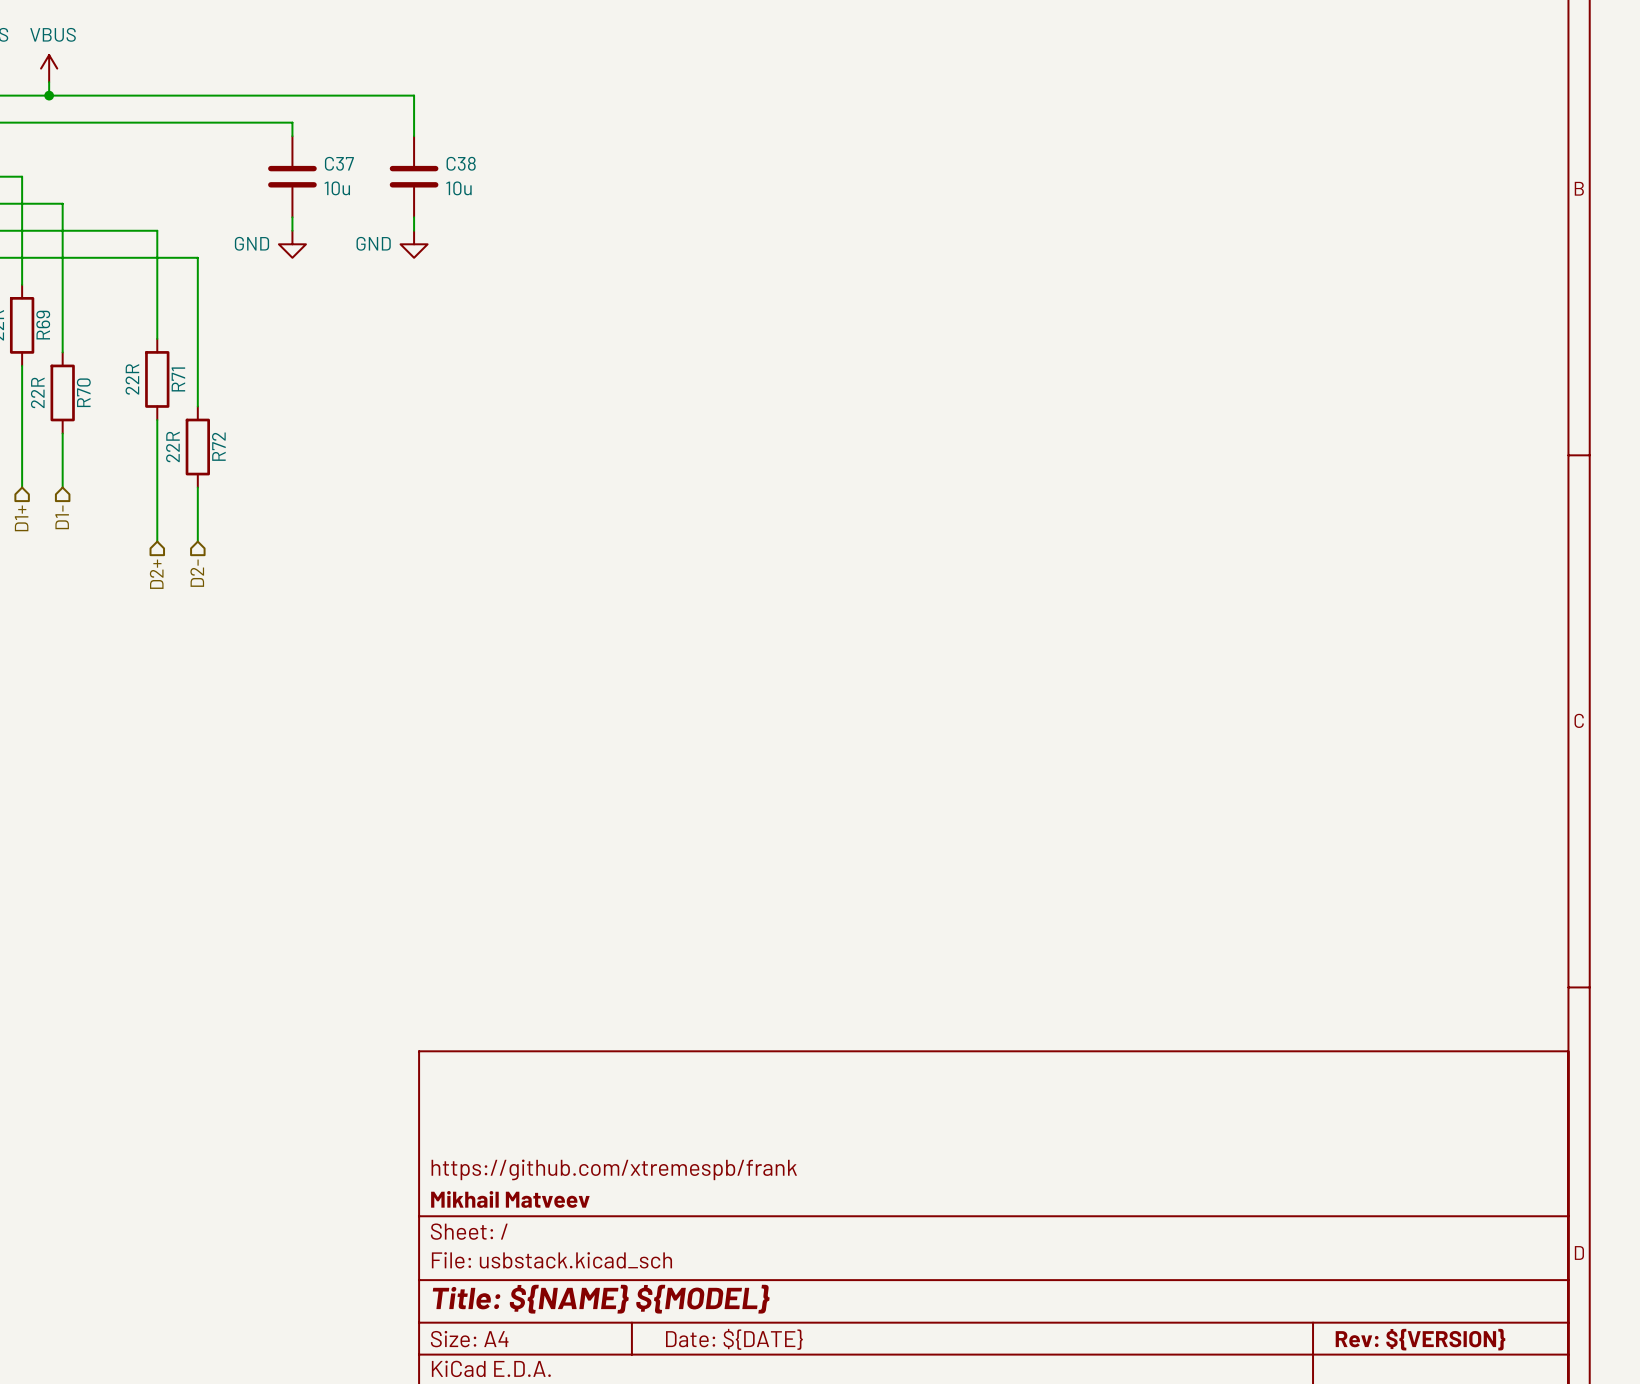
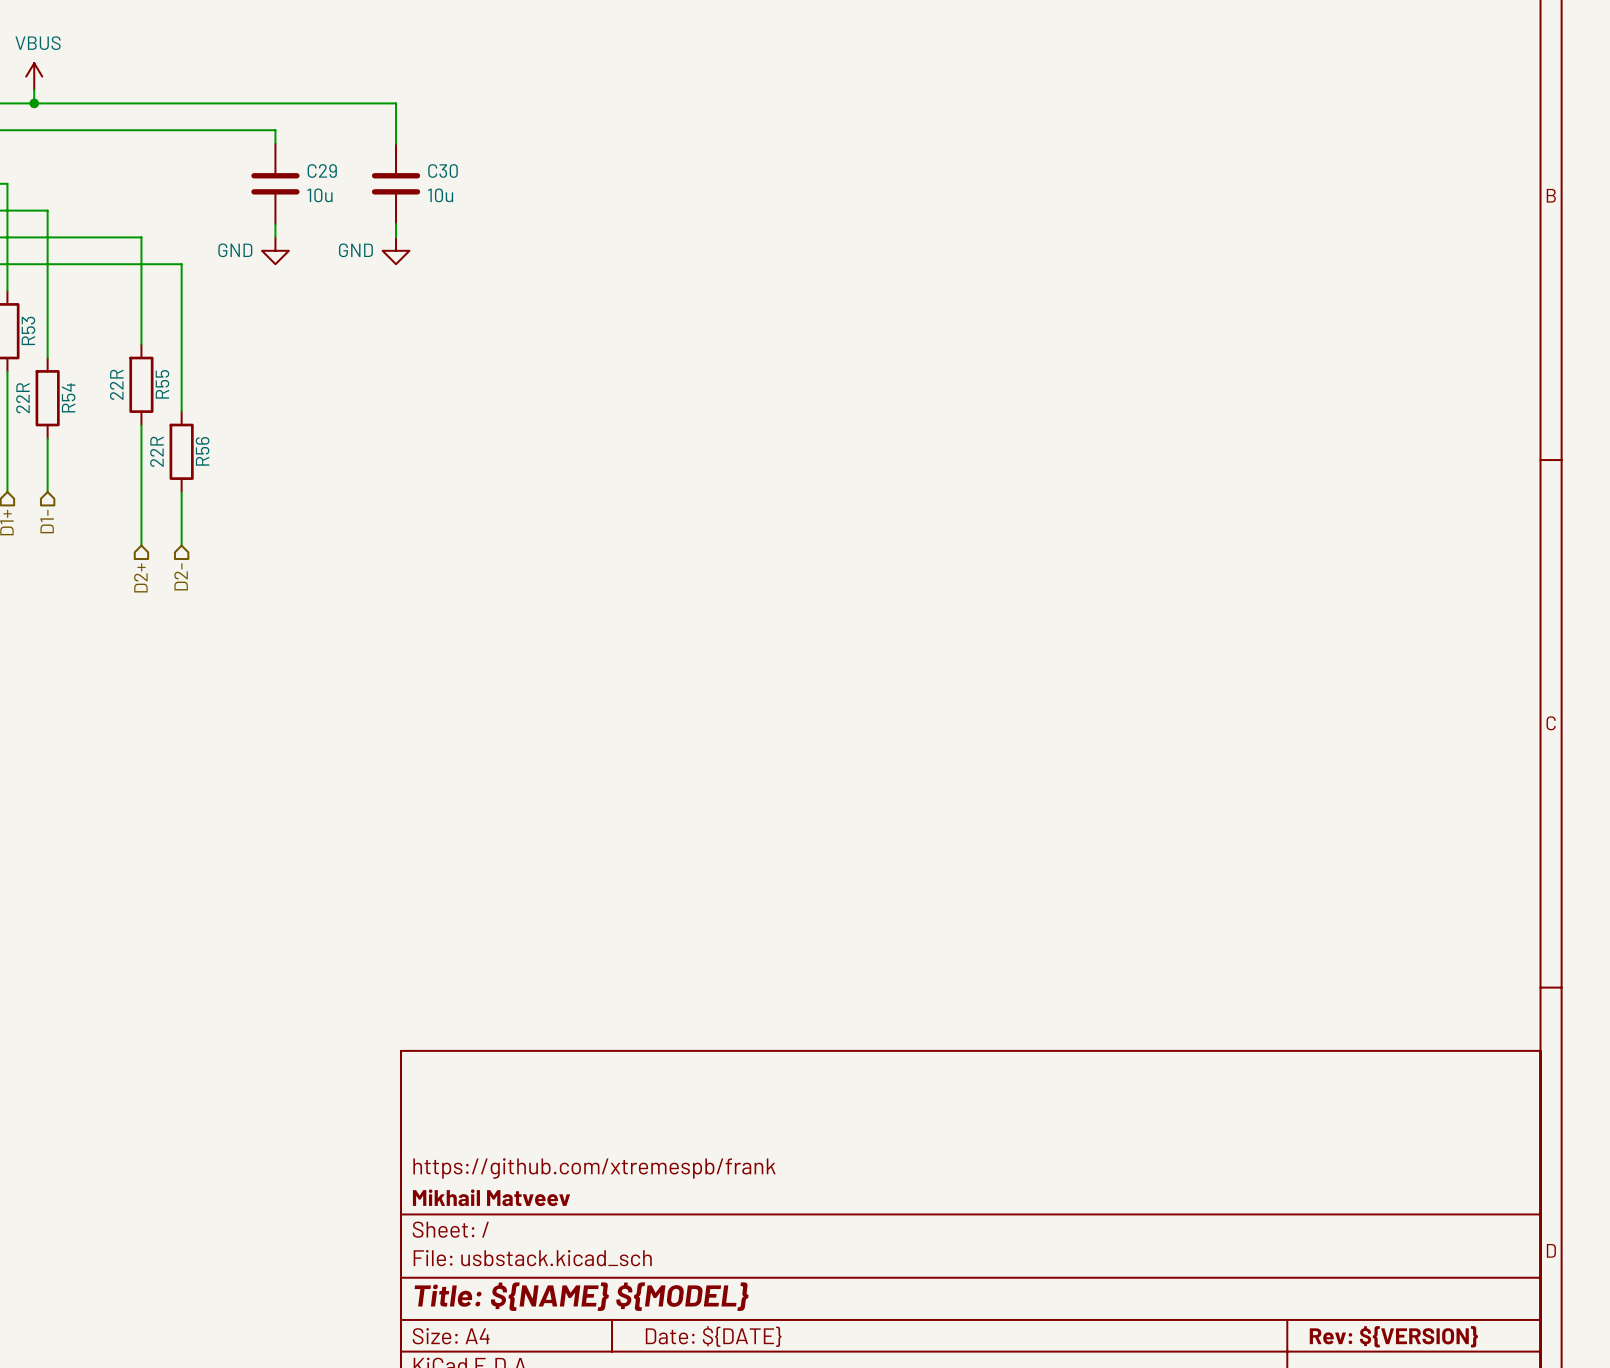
C37 name: C37 (339, 163) -> C29 (322, 170)
C38 name: C38 (461, 163) -> C30 (443, 170)
R69 name: R69 (43, 325) -> R53 (28, 330)
R71 name: R71 (178, 379) -> R55 (162, 384)
R70 name: R70 (83, 392) -> R54 (68, 397)
R72 name: R72 (218, 446) -> R56 (202, 451)

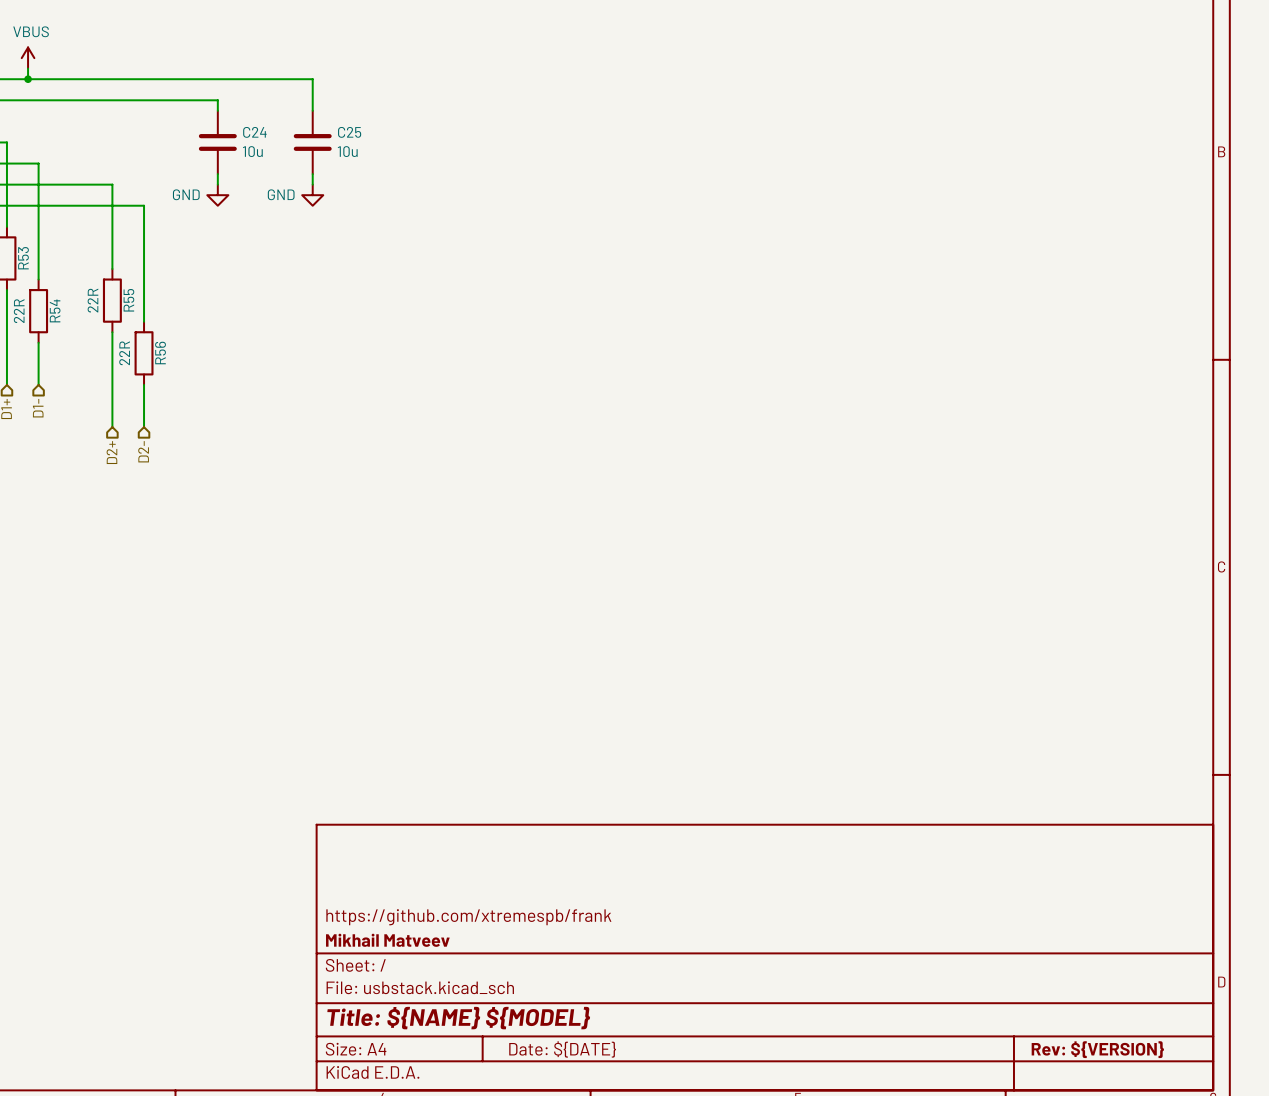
C29 name: C29 (322, 170) -> C24 (254, 132)
C30 name: C30 (443, 170) -> C25 (349, 132)

